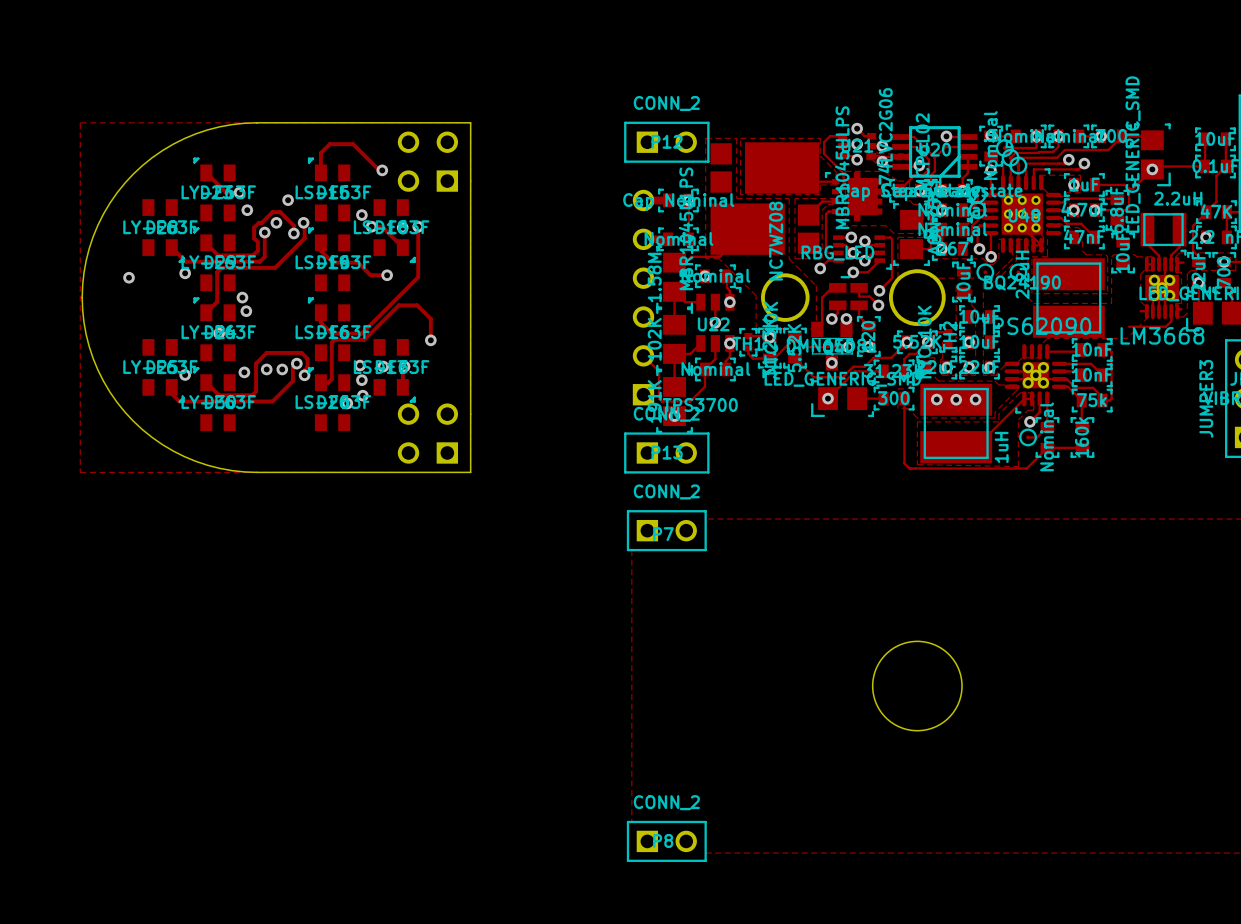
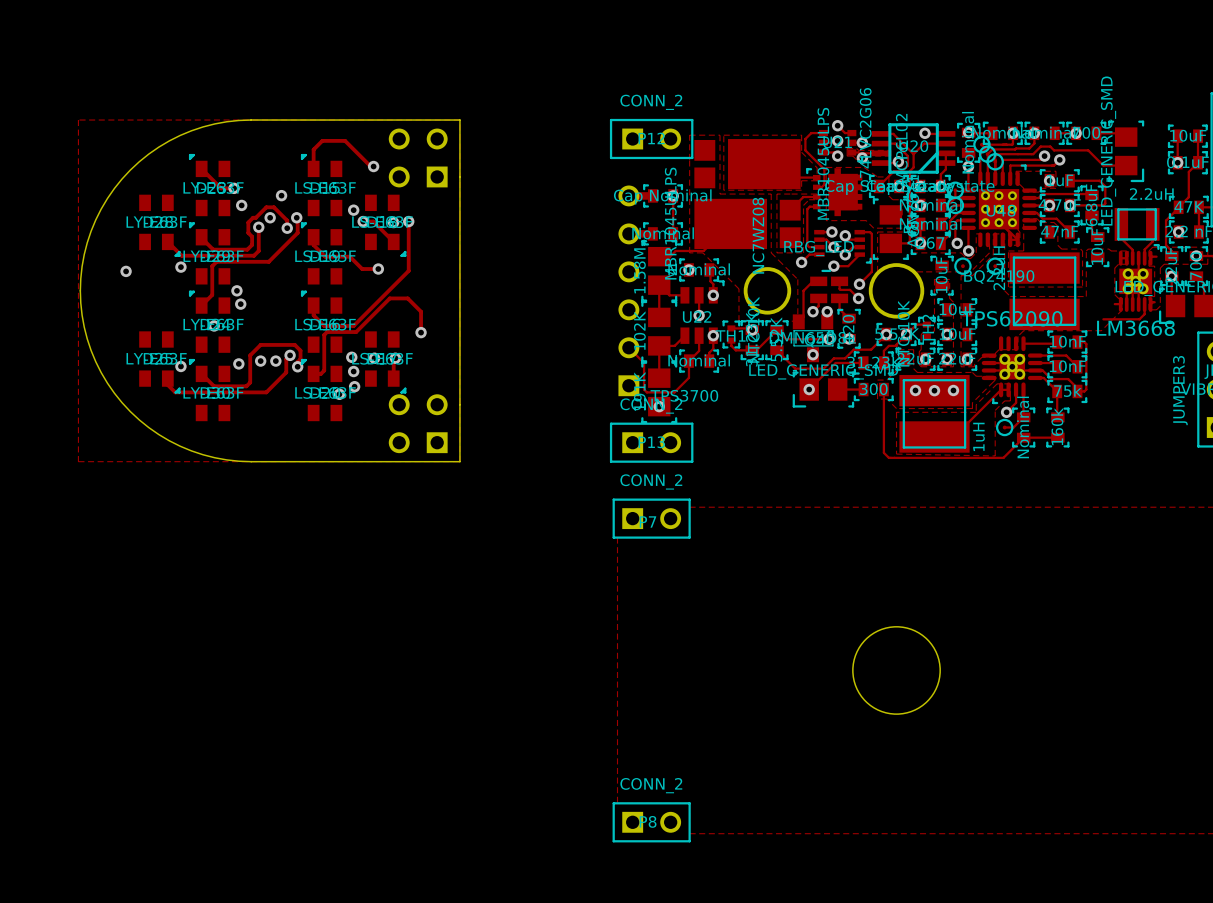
track: (1121, 136) (1108, 149) (1074, 149) -> (1126, 165) (1103, 165) (1088, 150) (1054, 150) (1050, 146)
track: (1205, 166) (1155, 166) (1132, 188) (1129, 188) (1129, 208) (1127, 210) -> (1103, 184) (1105, 186) (1105, 203) (1101, 205)
via position: (1152, 169) -> (1177, 162)

